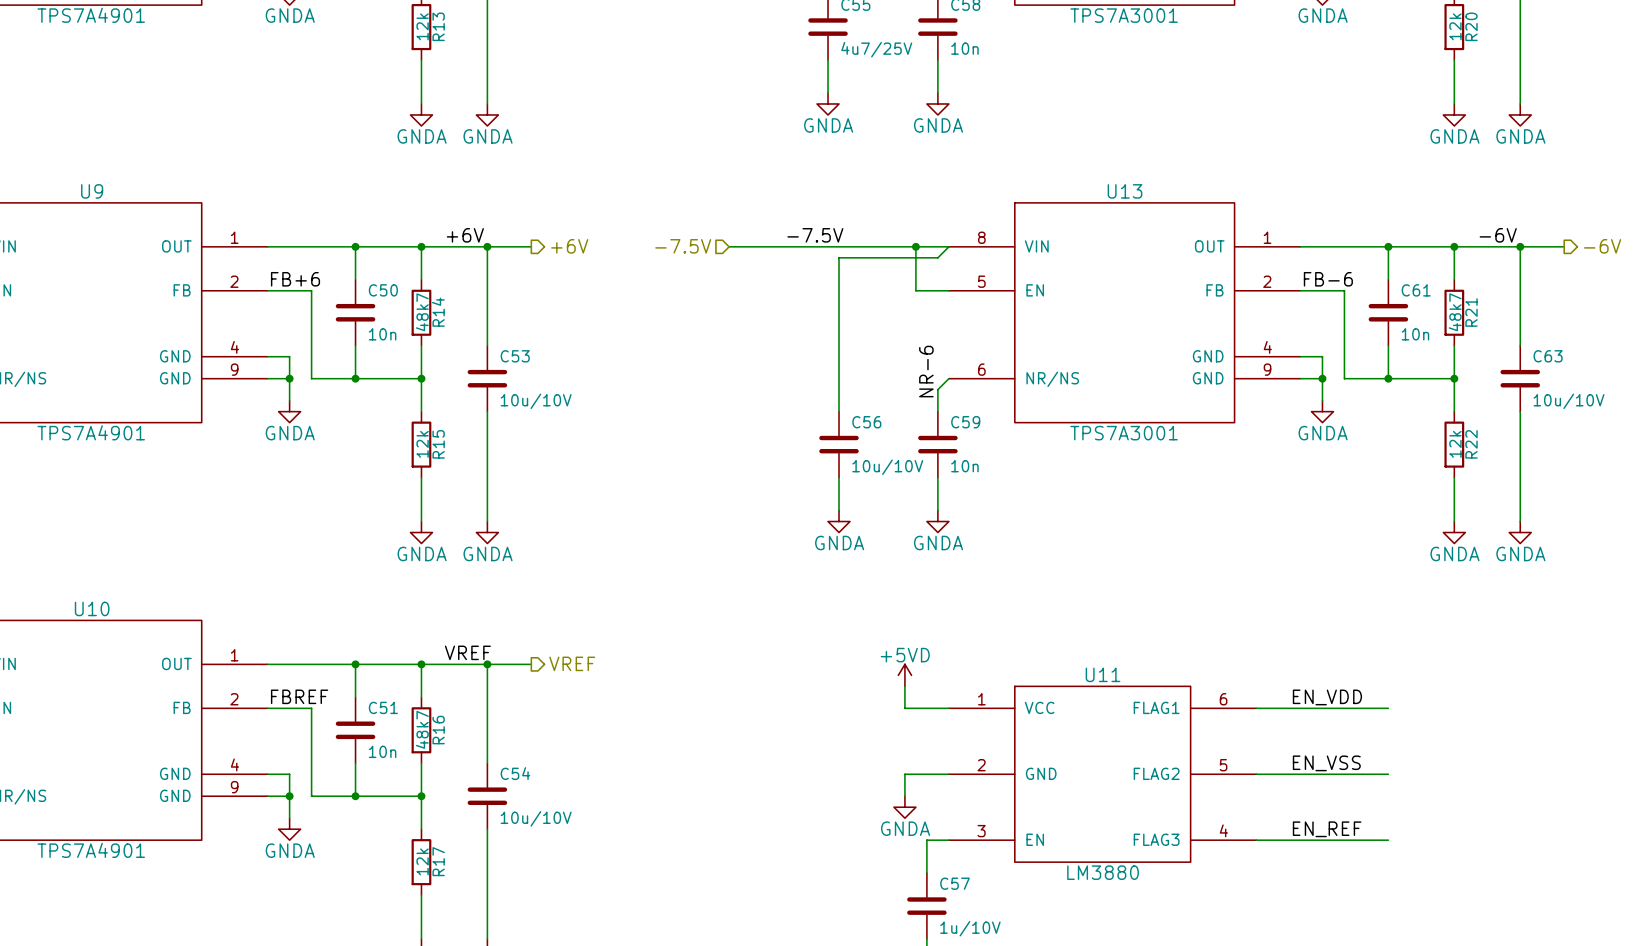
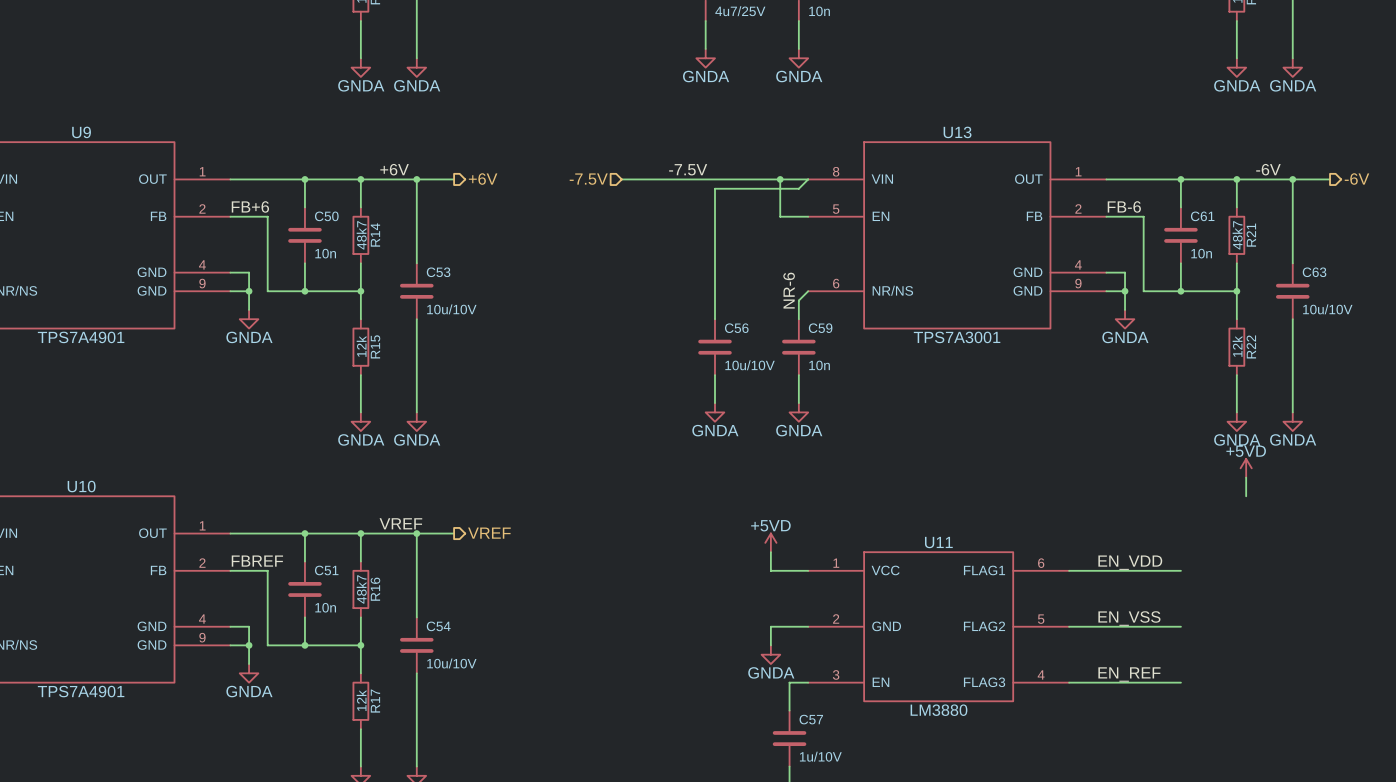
power symbol: none -> +5VD (1246, 468)
wire: none -> (1246, 477) (1246, 496)

